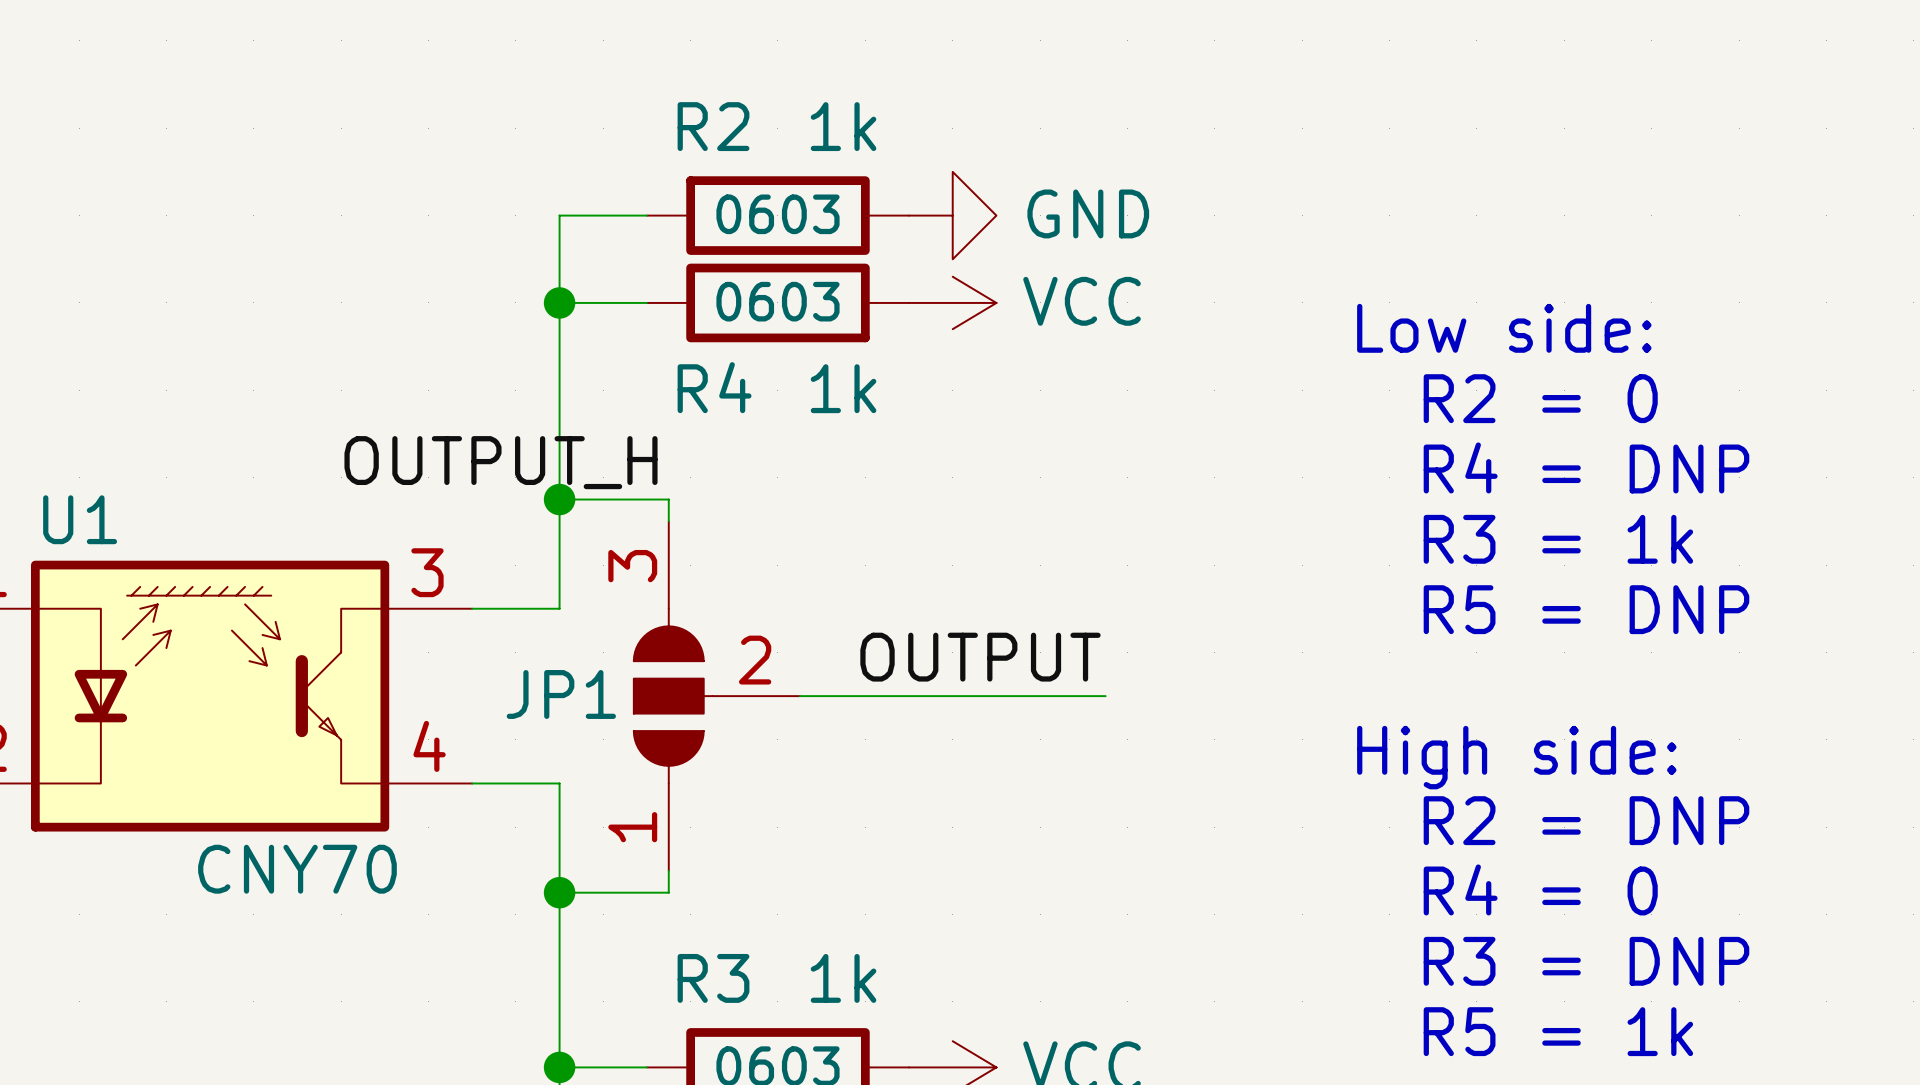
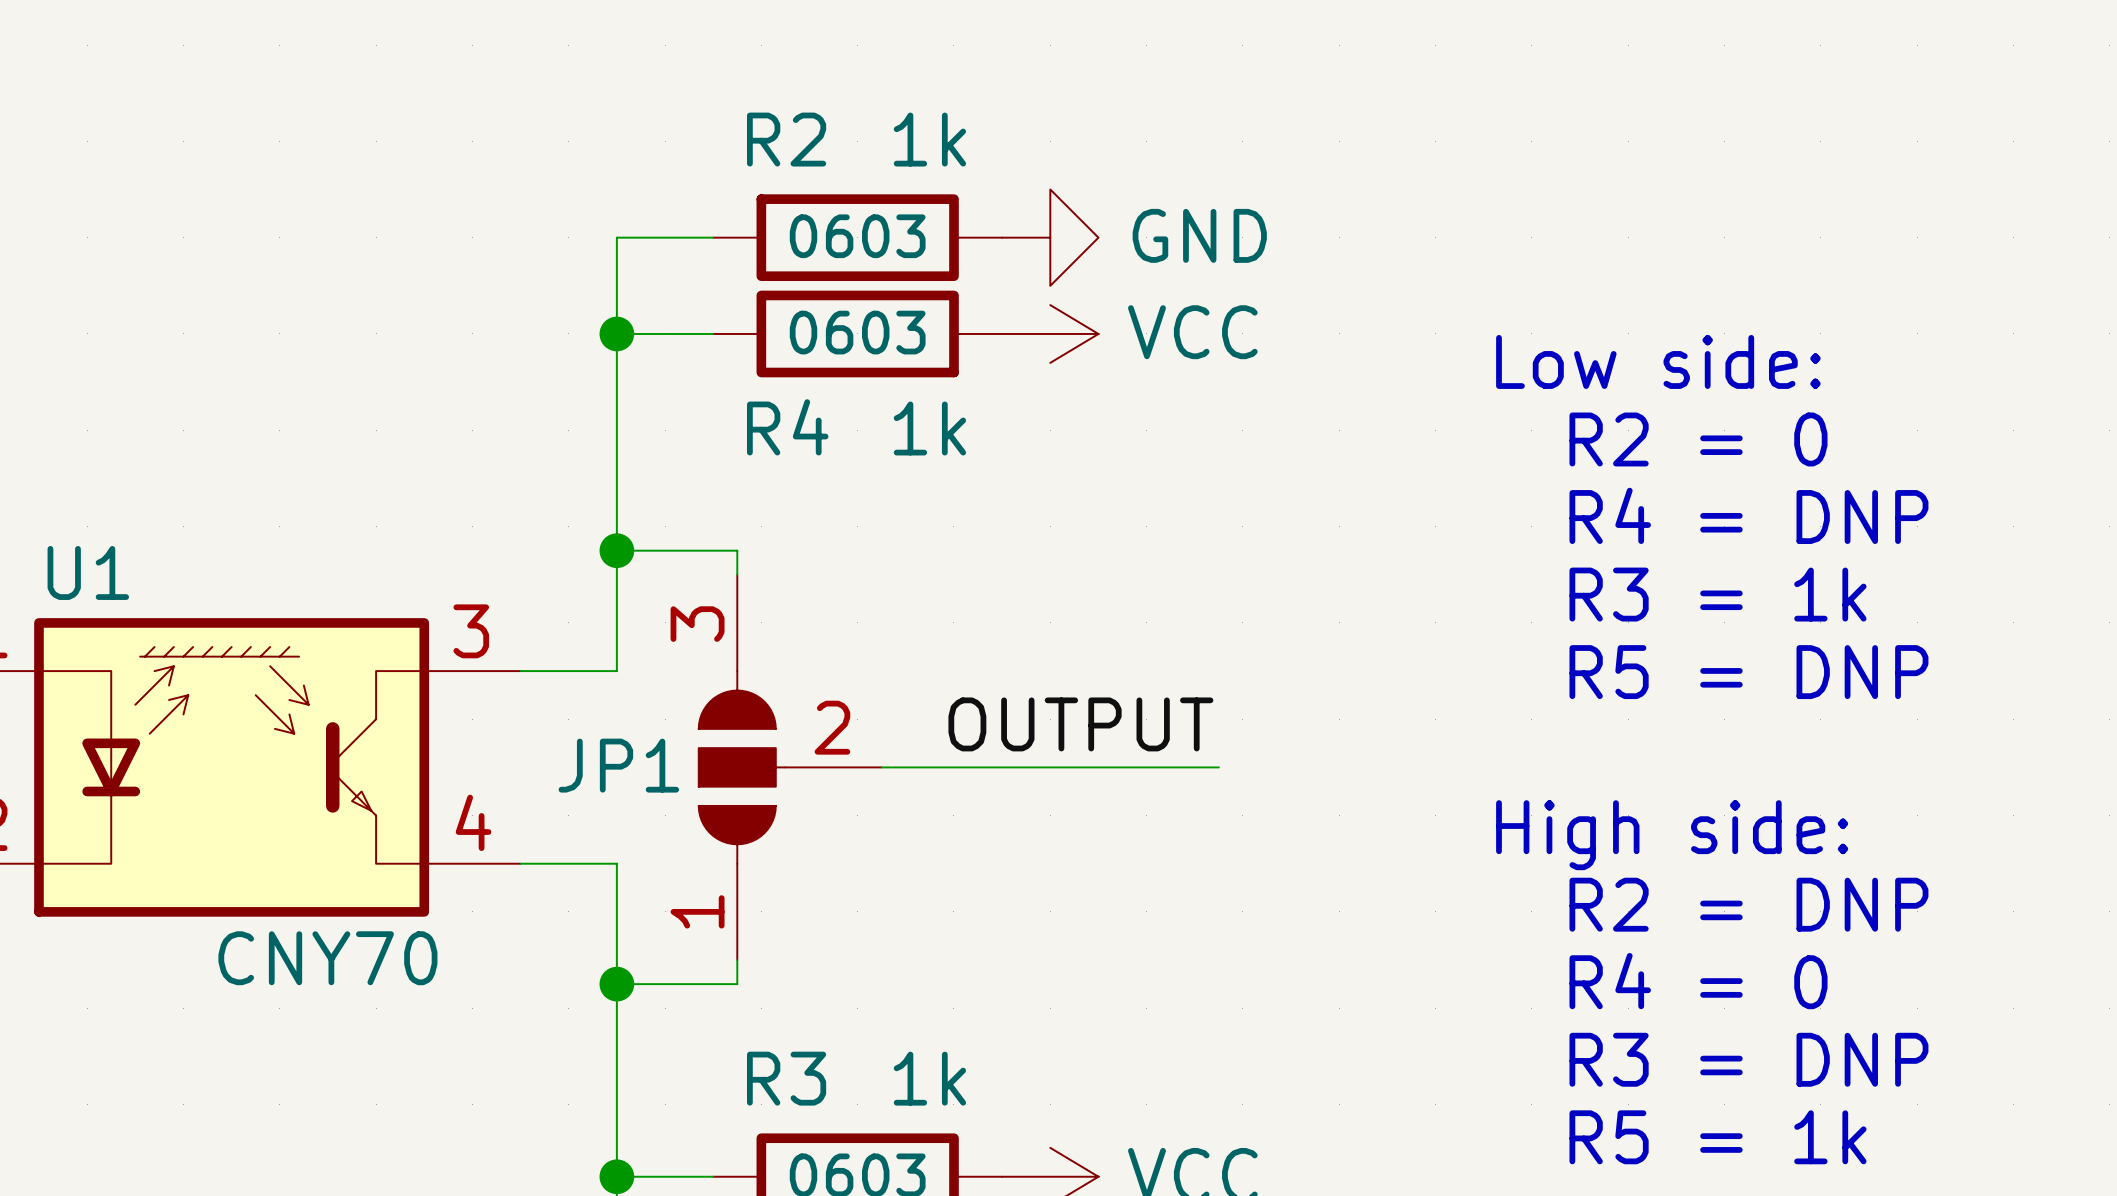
label: OUTPUT_H (501, 462) -> none

